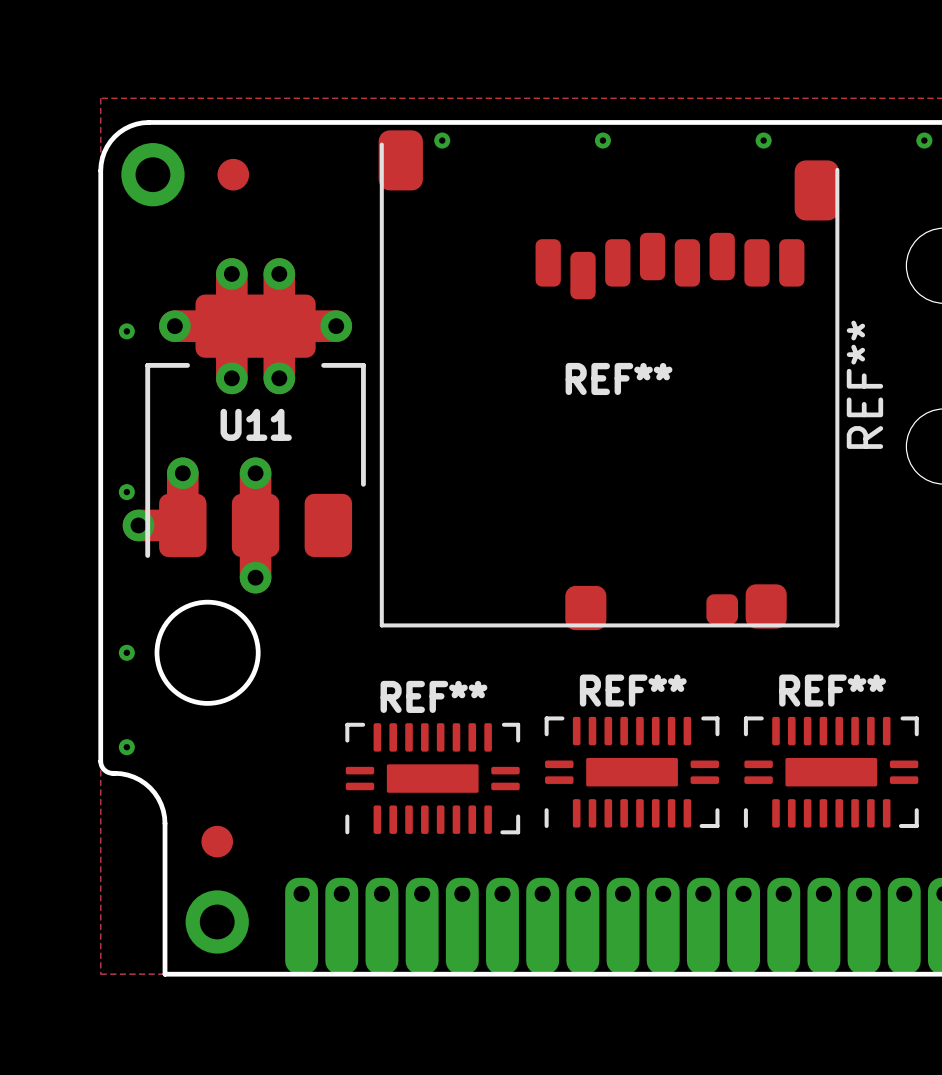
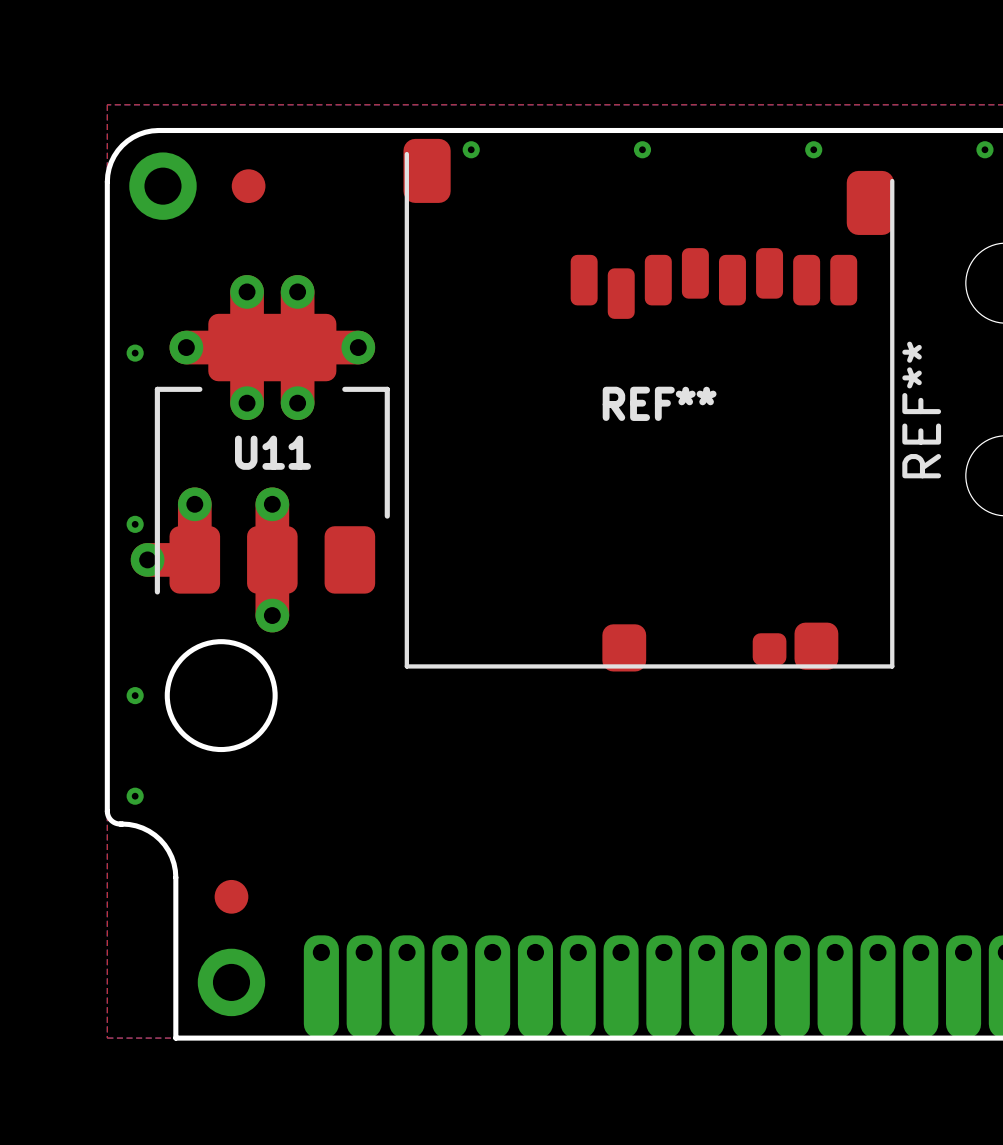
part: (632, 772) -> none
part: (831, 772) -> none
part: (432, 778) -> none

